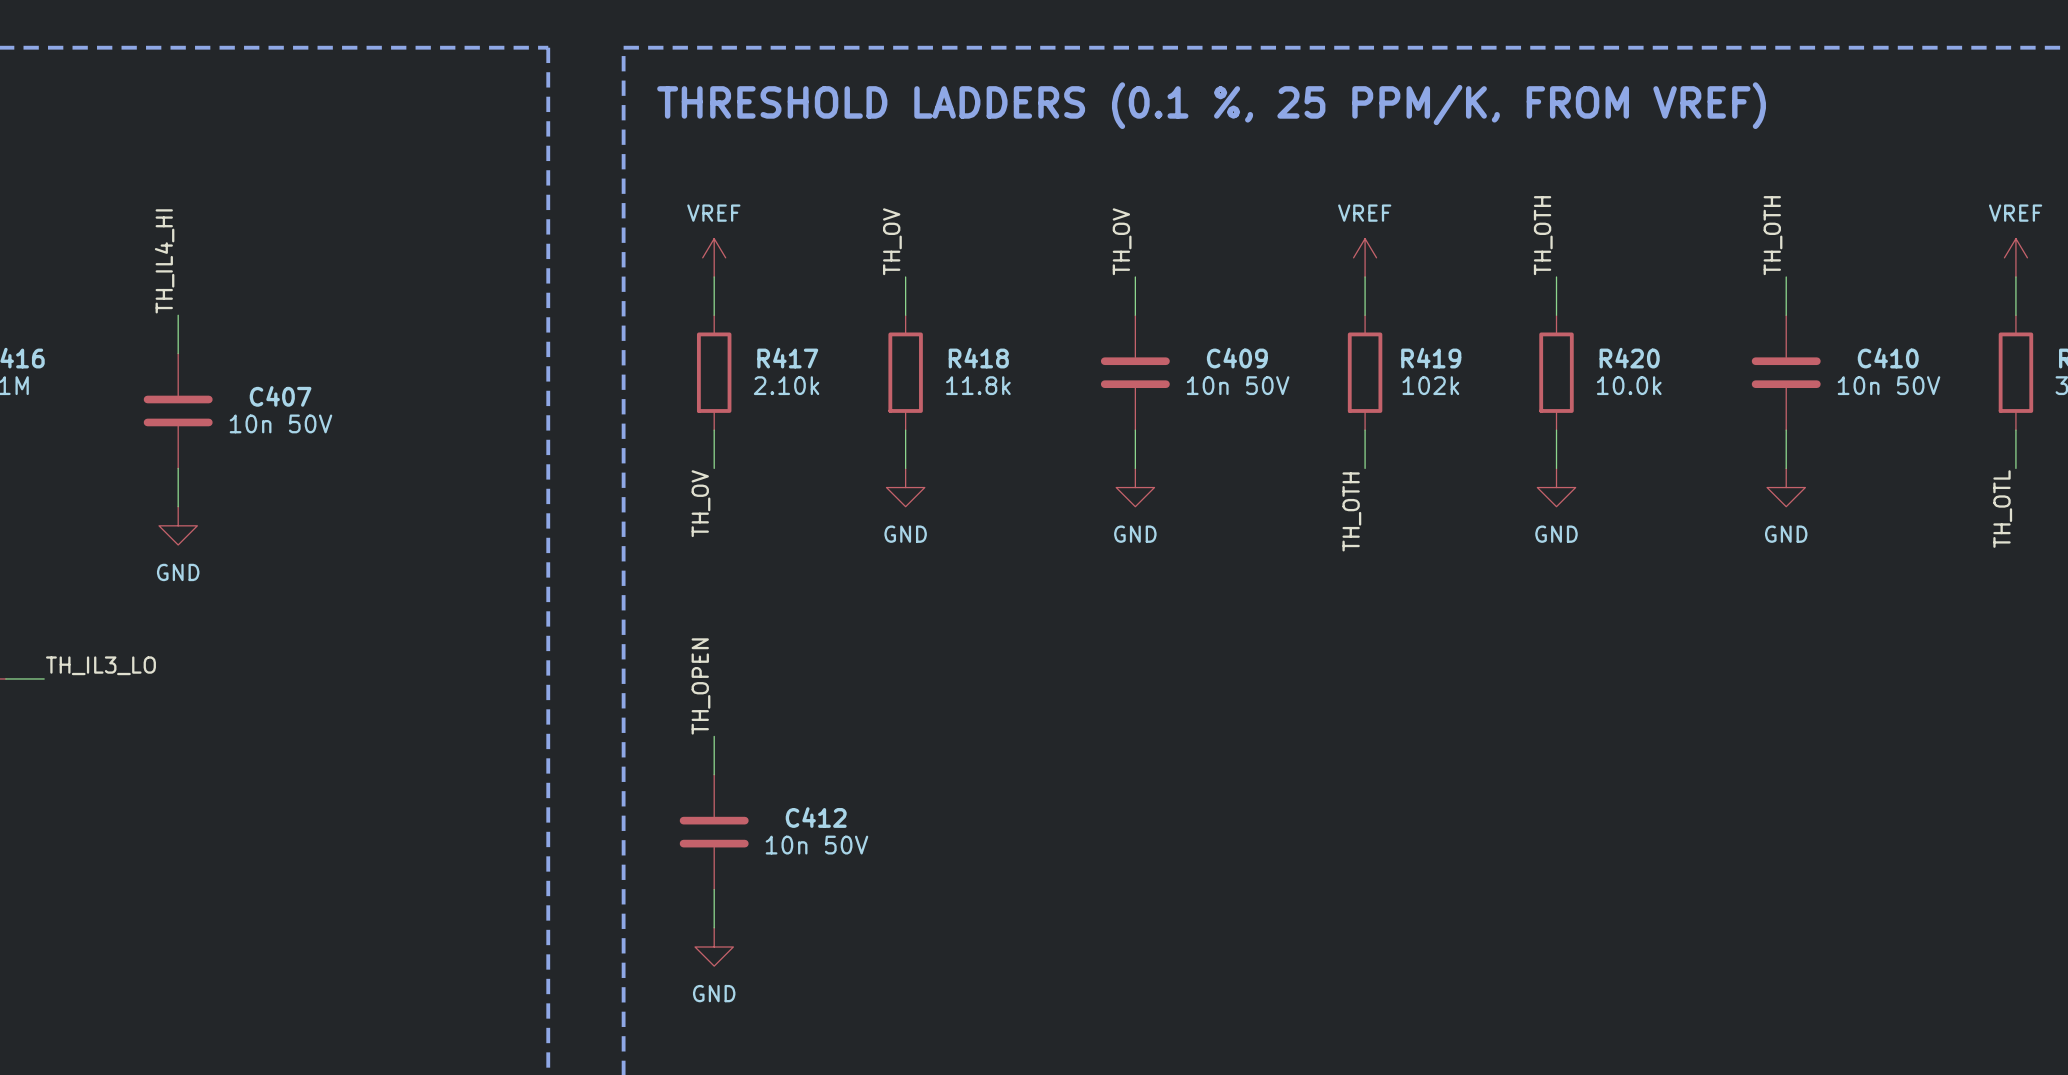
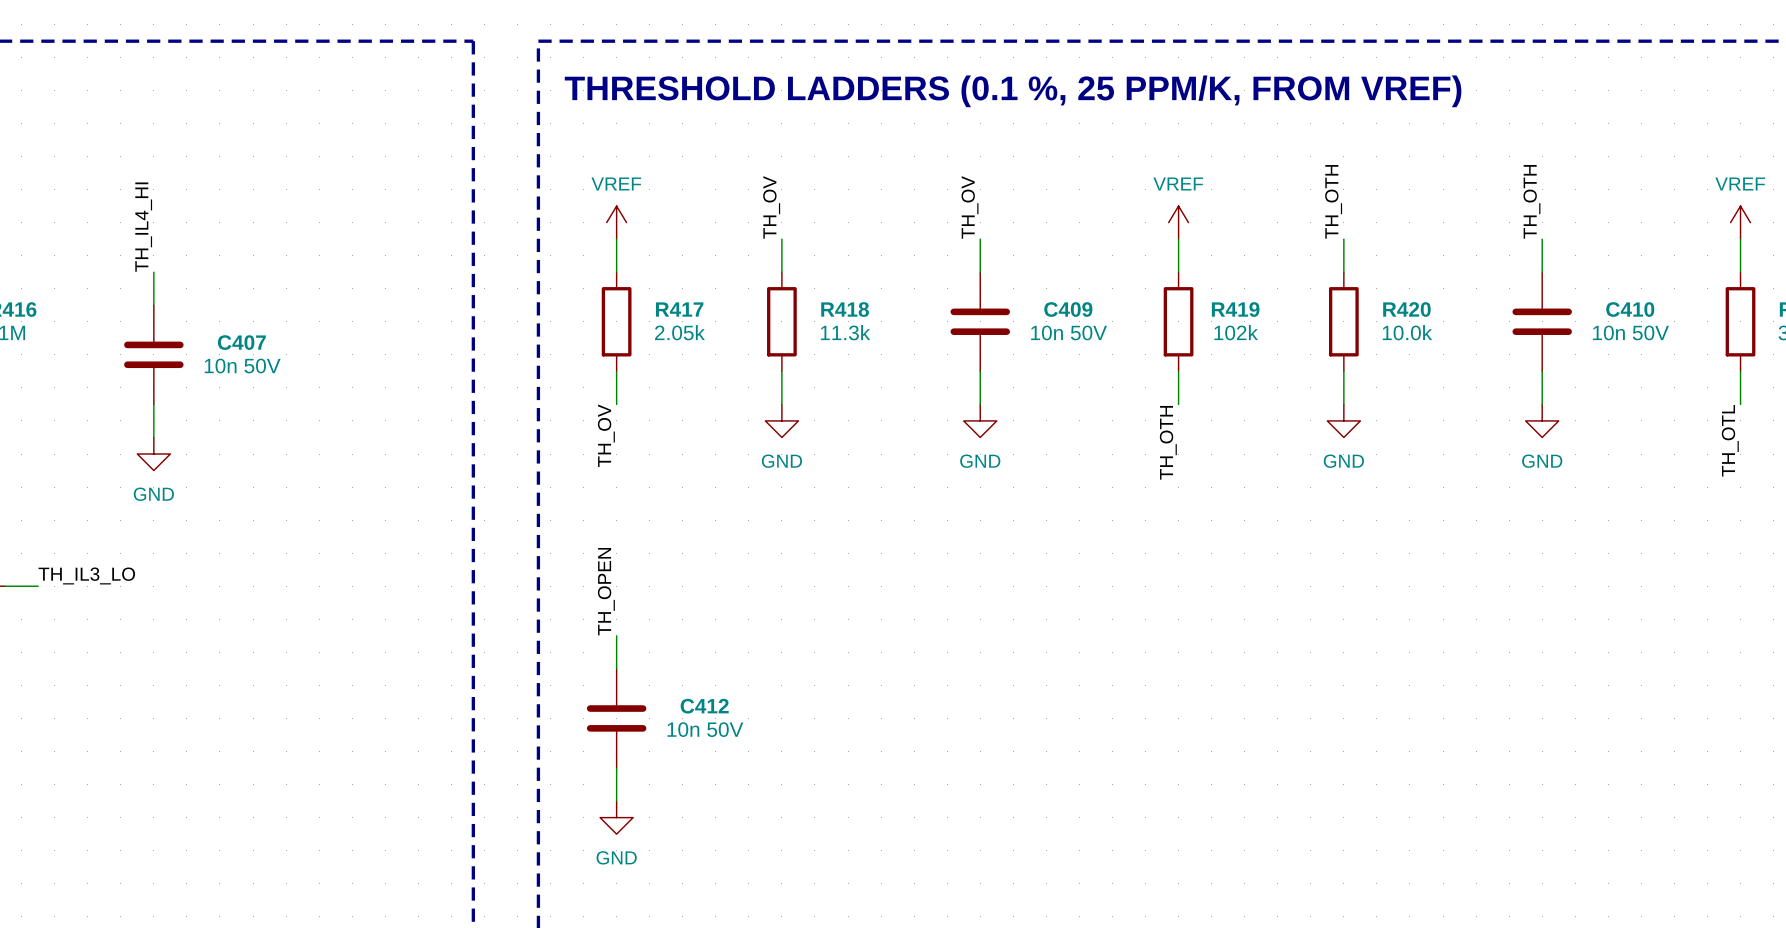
R417 value: 2.10k (786, 385) -> 2.05k (679, 332)
R418 value: 11.8k (978, 385) -> 11.3k (845, 332)

